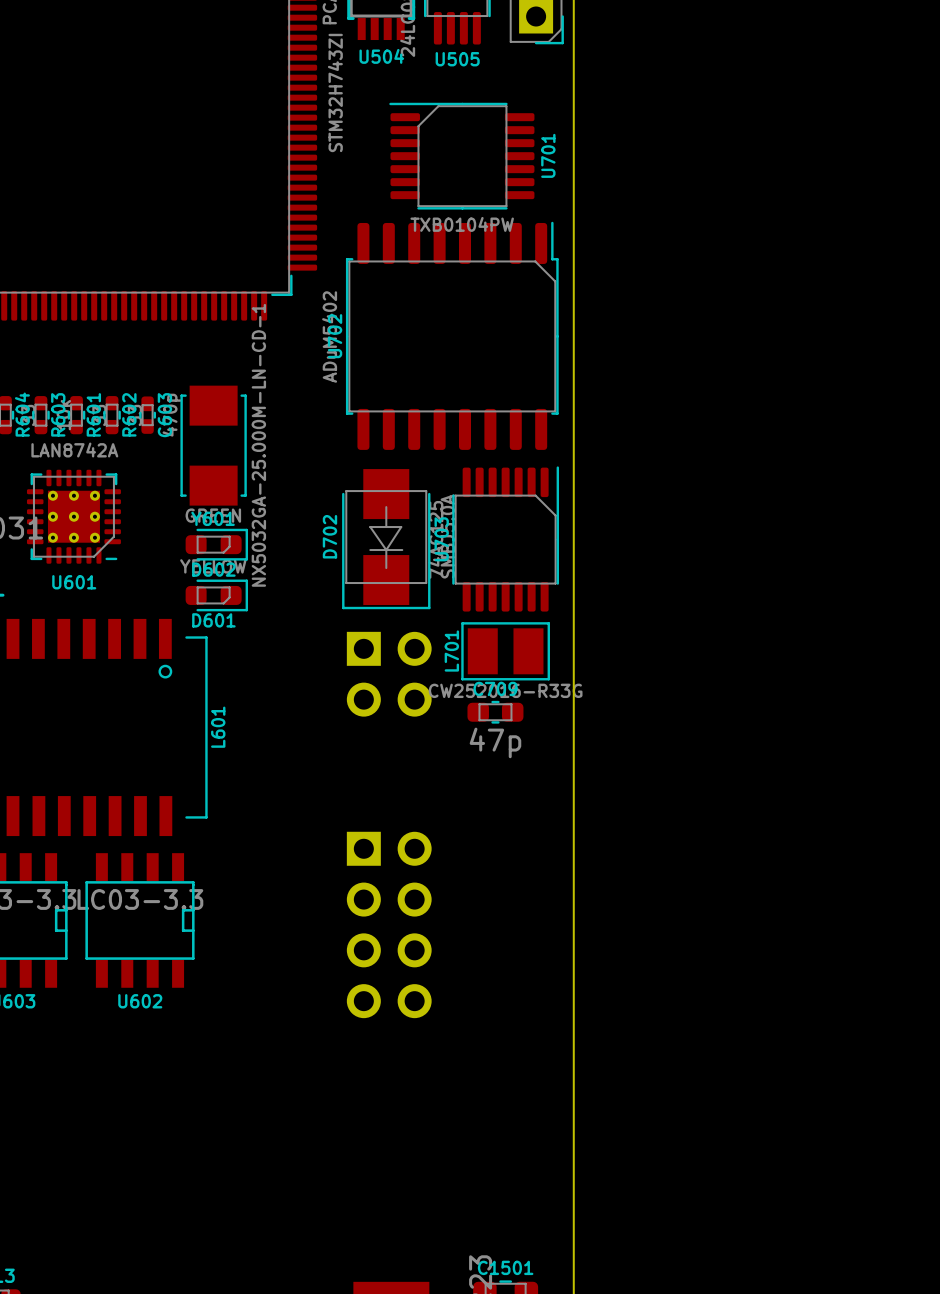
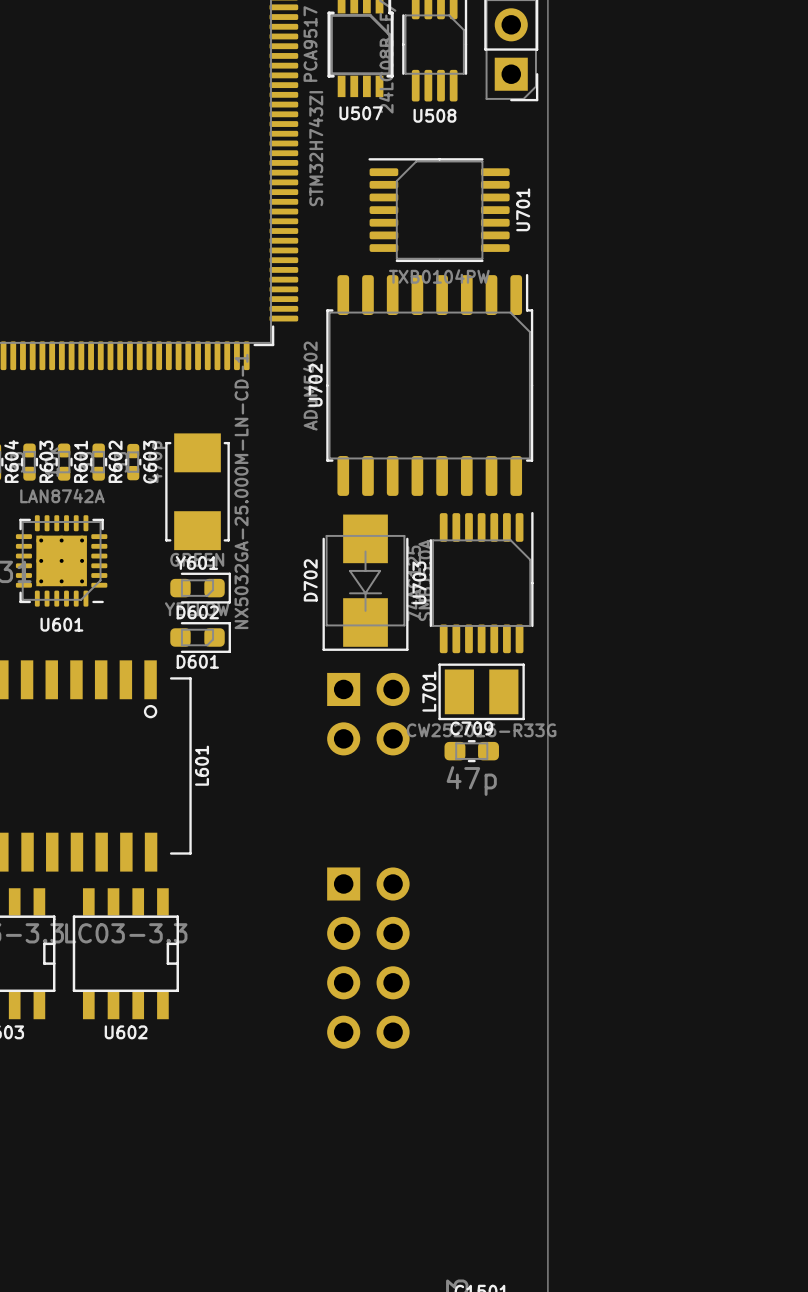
U504 name: U504 (381, 56) -> U507 (361, 113)
U505 name: U505 (457, 59) -> U508 (434, 115)

